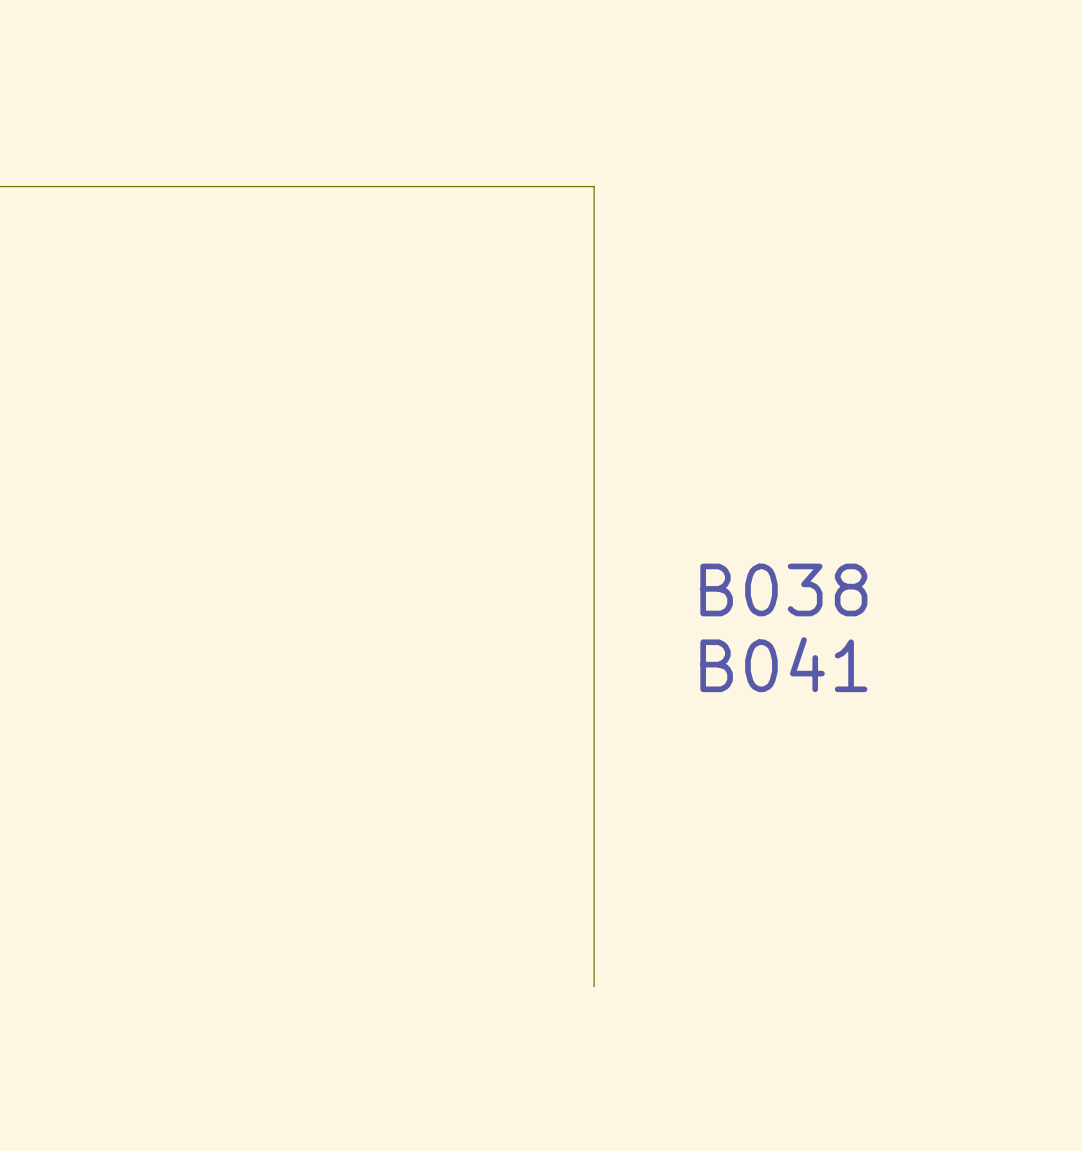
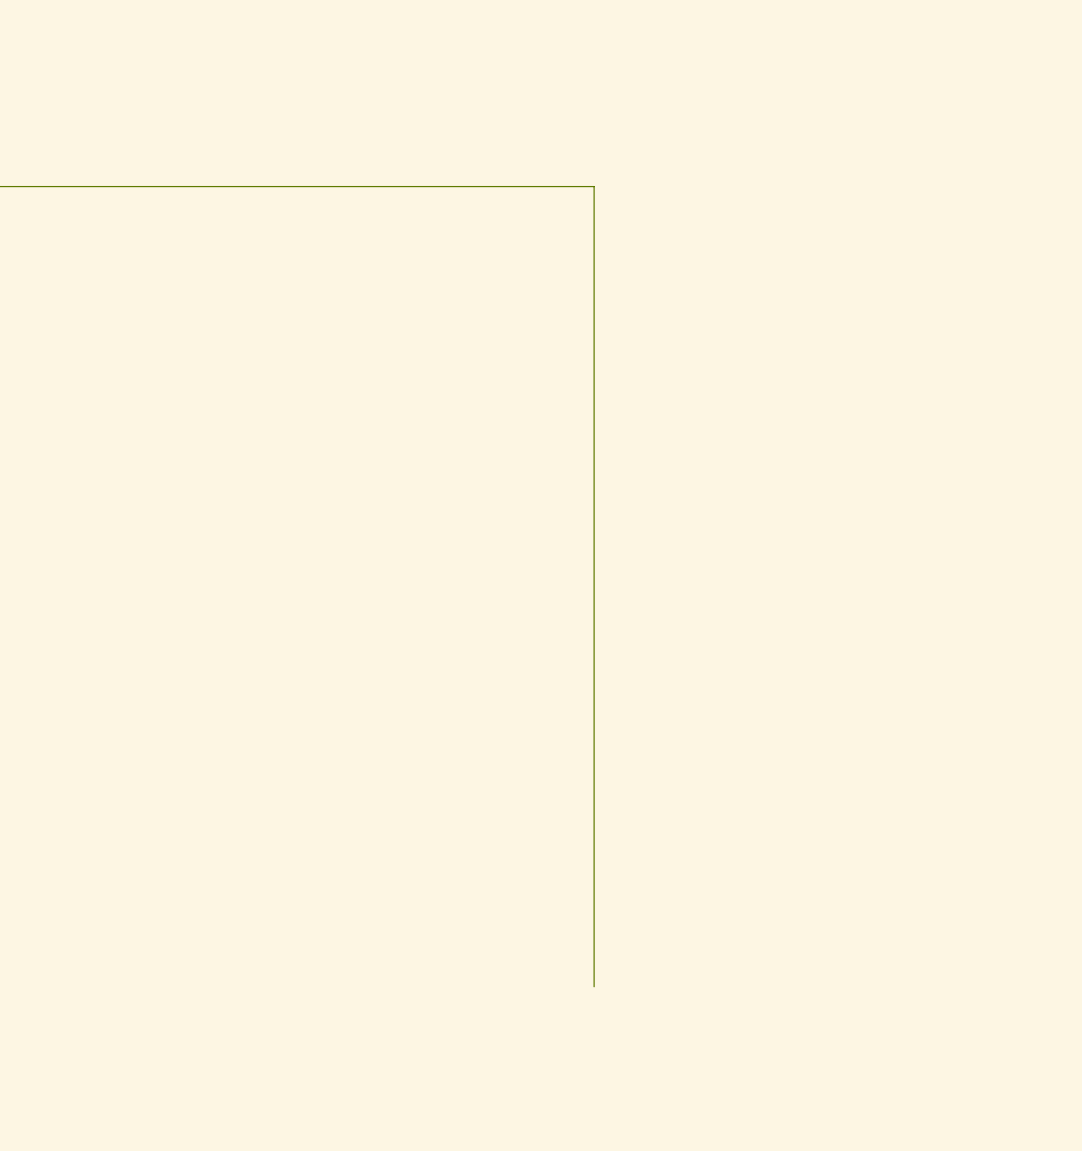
text: B038 (783, 589) -> none
text: B041 (783, 664) -> none

